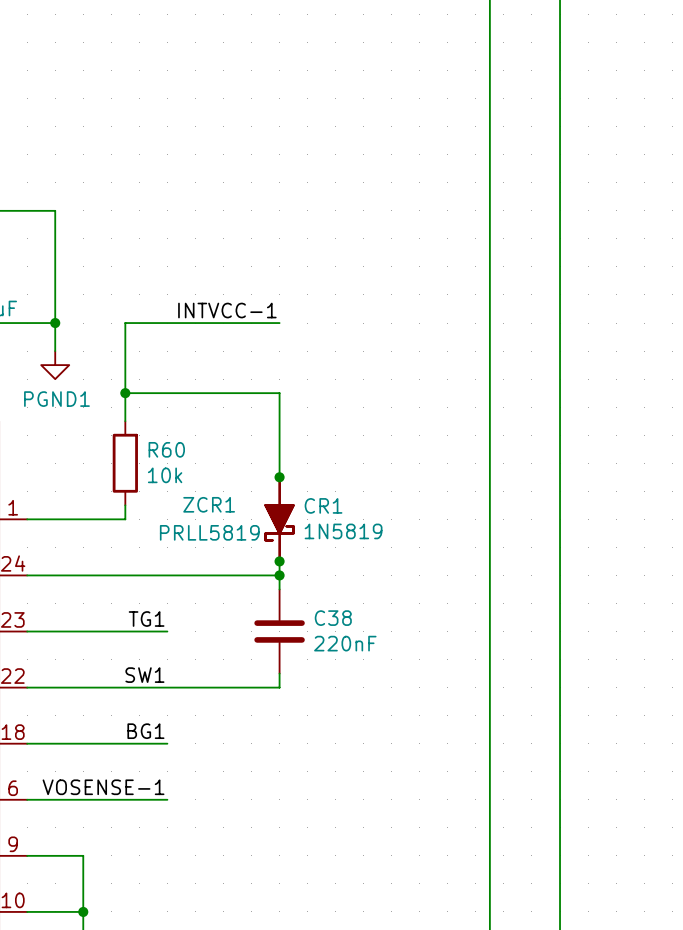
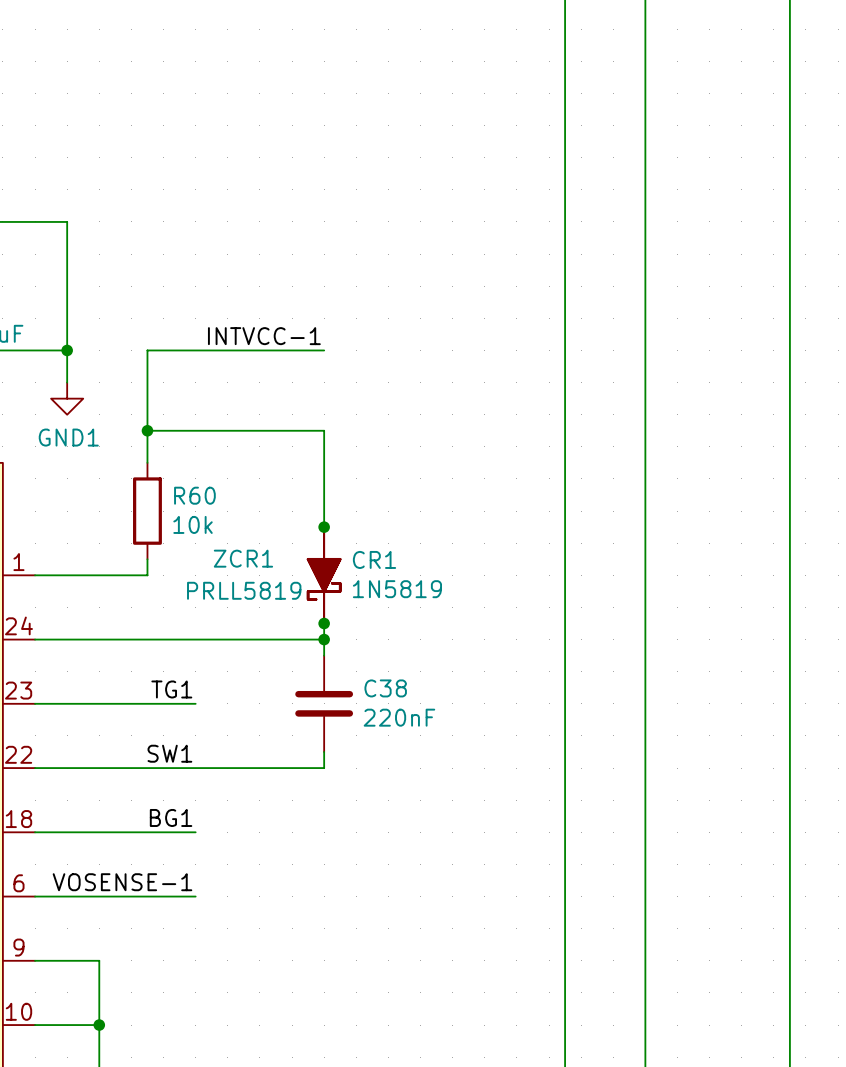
power symbol: PGND1 (55, 365) -> GND1 (67, 398)

